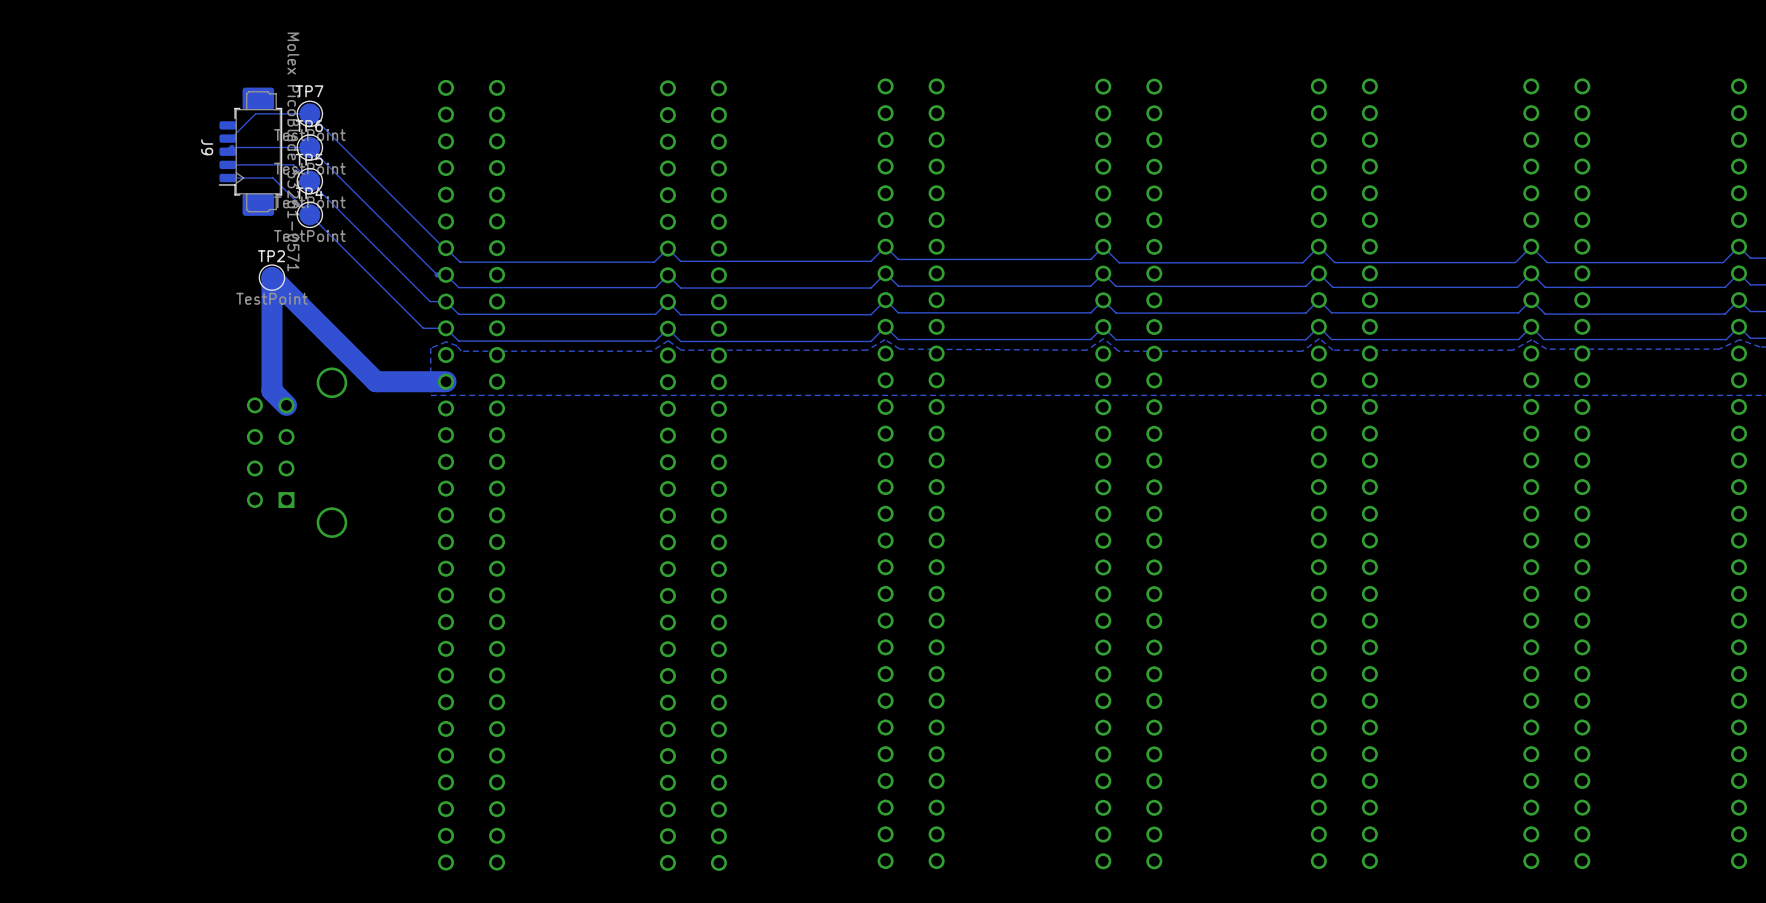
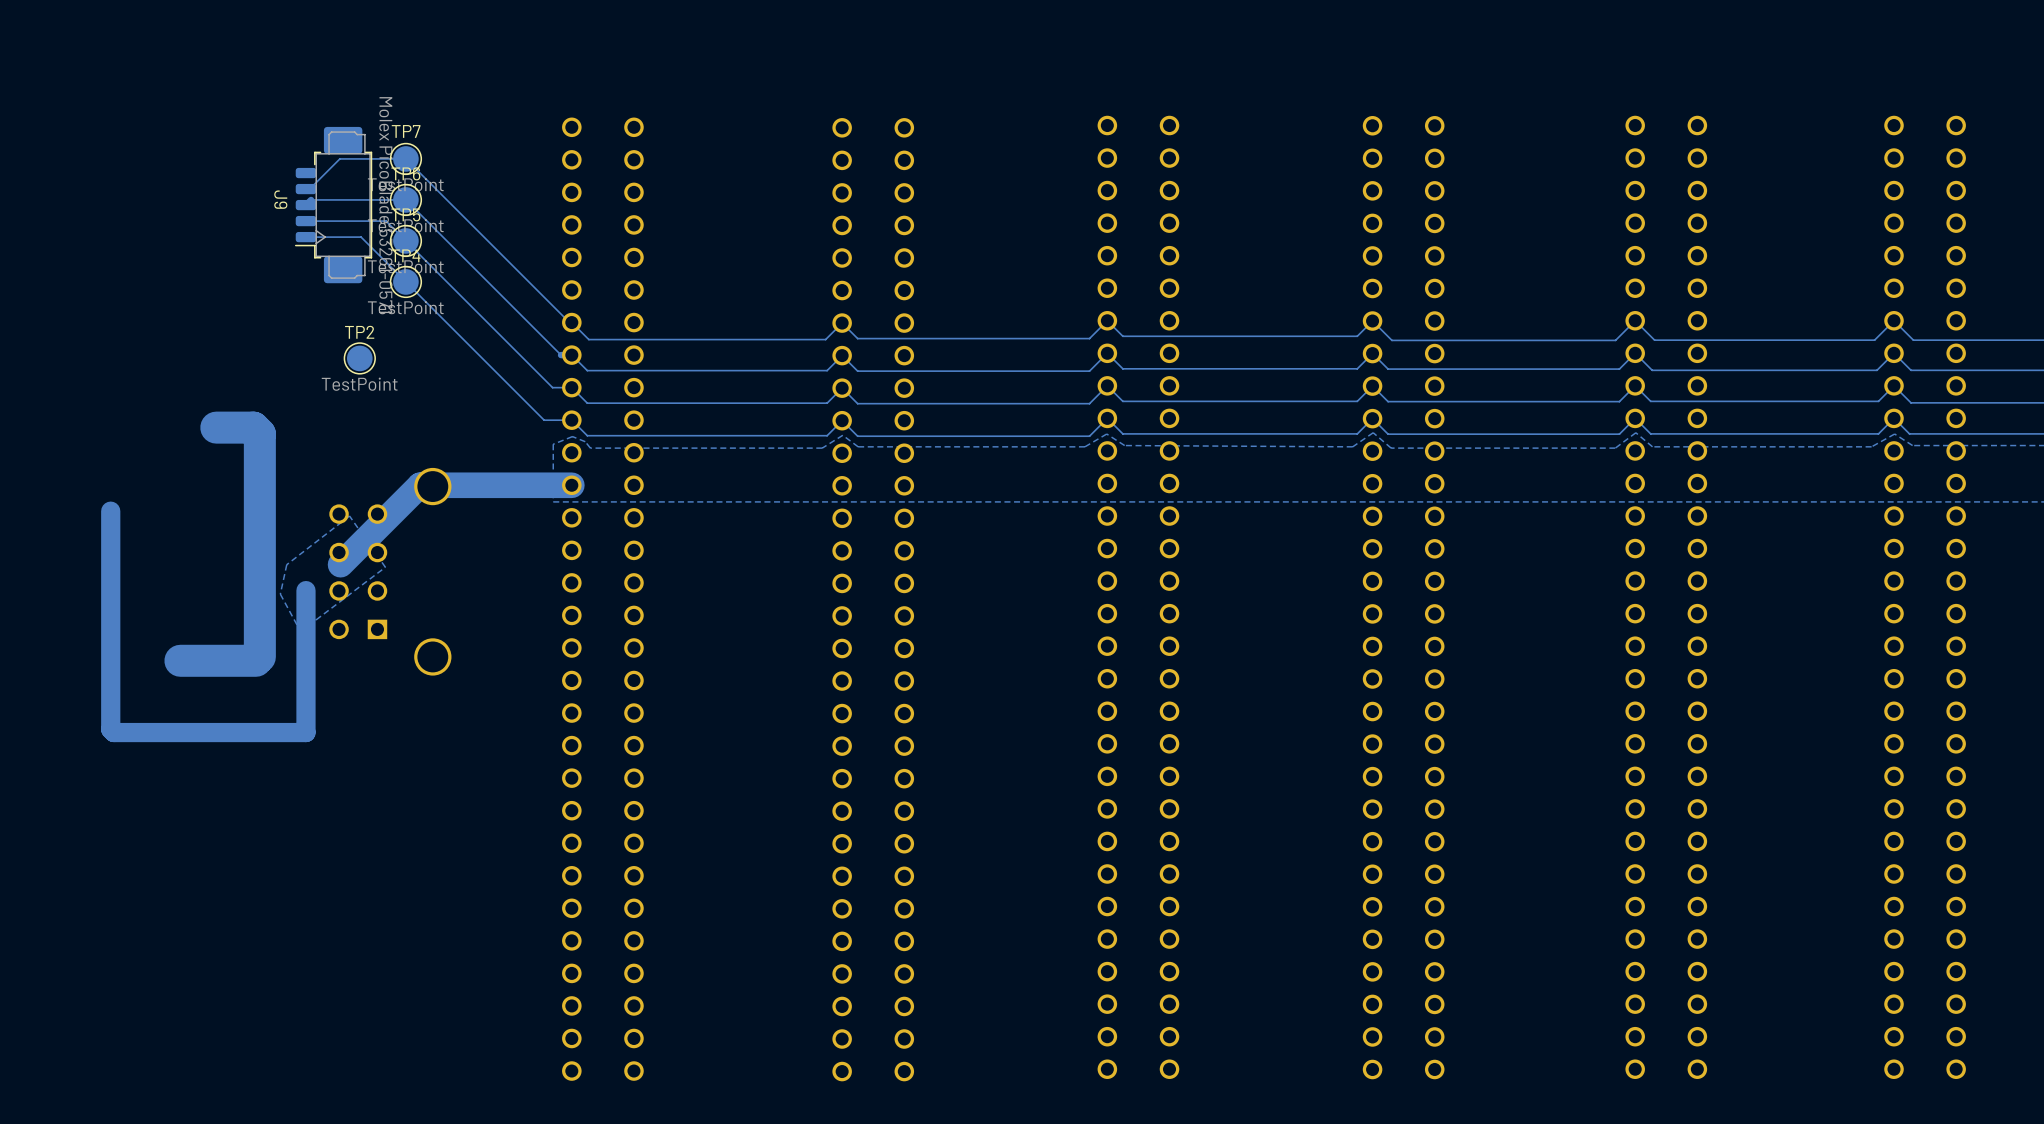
track: none -> (216, 427) (253, 427) (259, 434) (259, 656) (256, 660) (180, 660)
track: (376, 381) (271, 277) (271, 390) (286, 405) -> (486, 485) (420, 485) (340, 564)
track: none -> (110, 511) (110, 729) (113, 732) (305, 732) (305, 590)
zone outline: none -> (349, 516) (385, 567) (316, 619) (297, 624) (280, 594) (286, 564) (349, 516)

